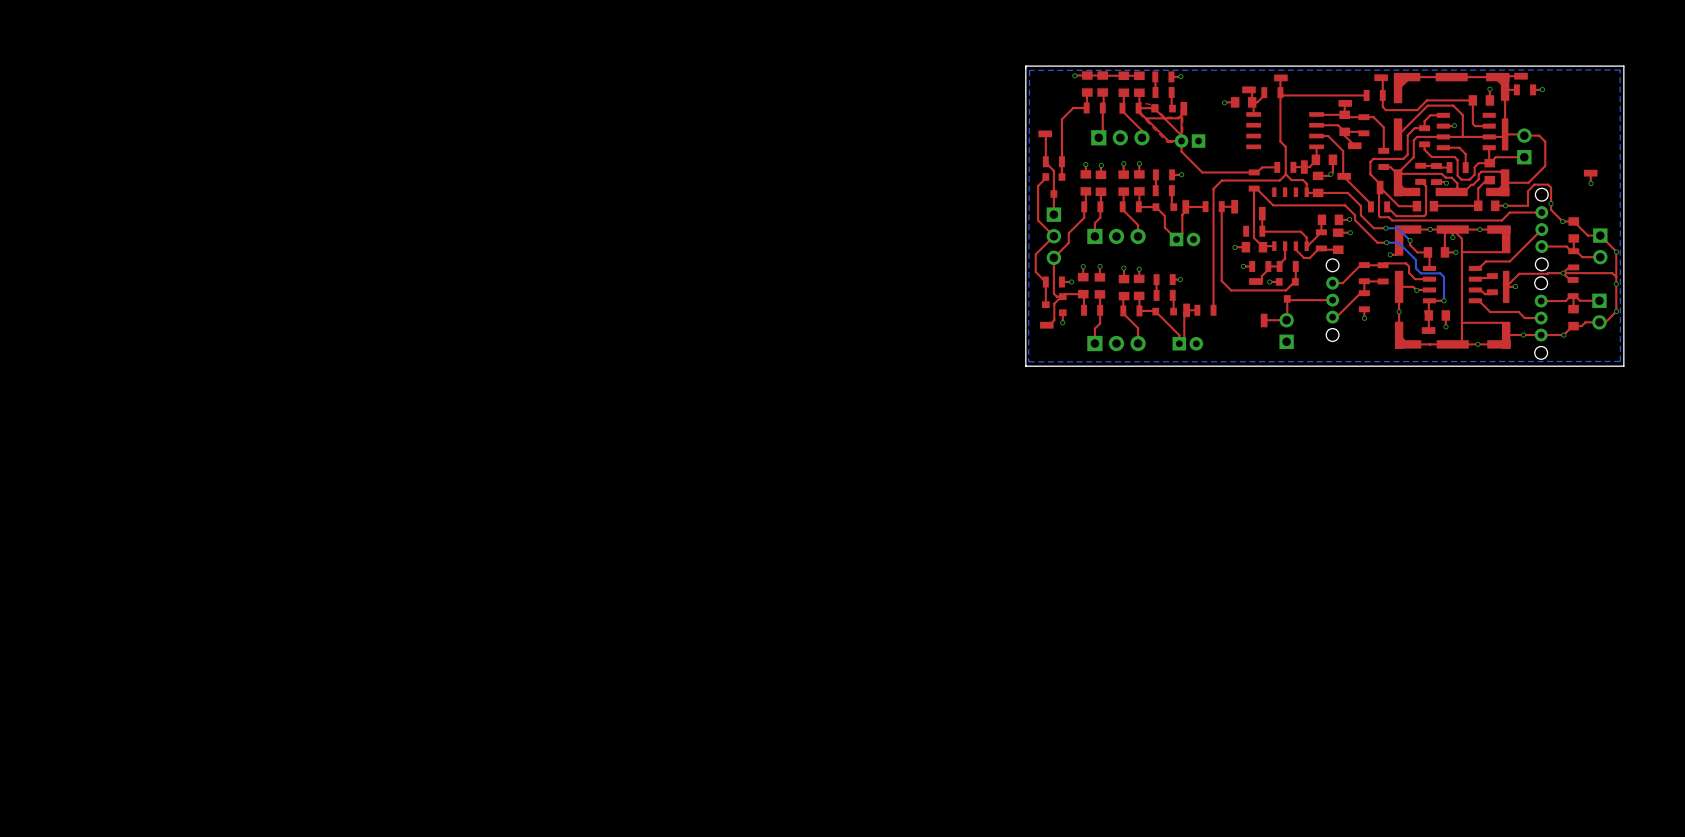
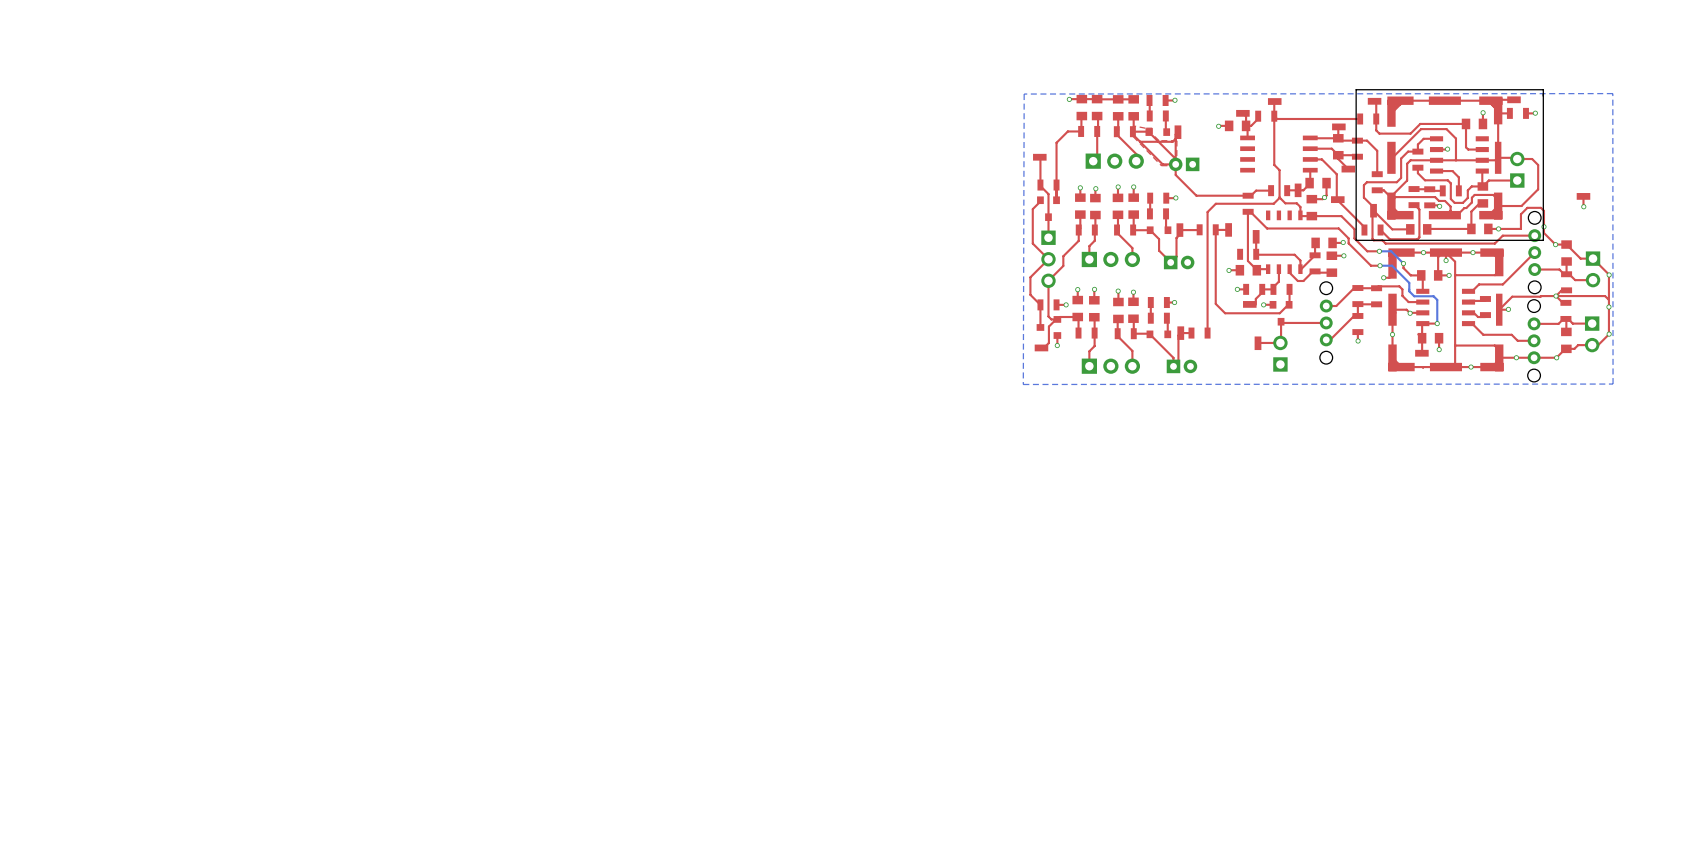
board edge: (1550, 66) (1623, 66) (1623, 366) (1025, 366) (1025, 66) (1362, 66) -> (1543, 89) (1543, 240) (1356, 240) (1356, 89)

